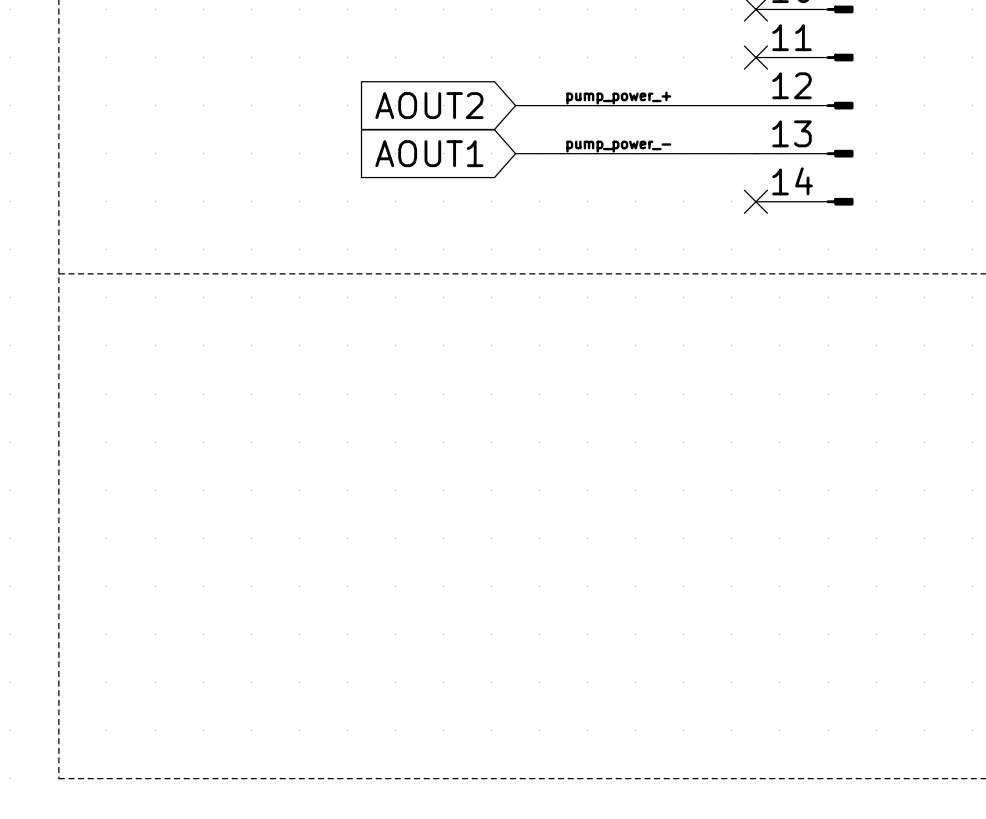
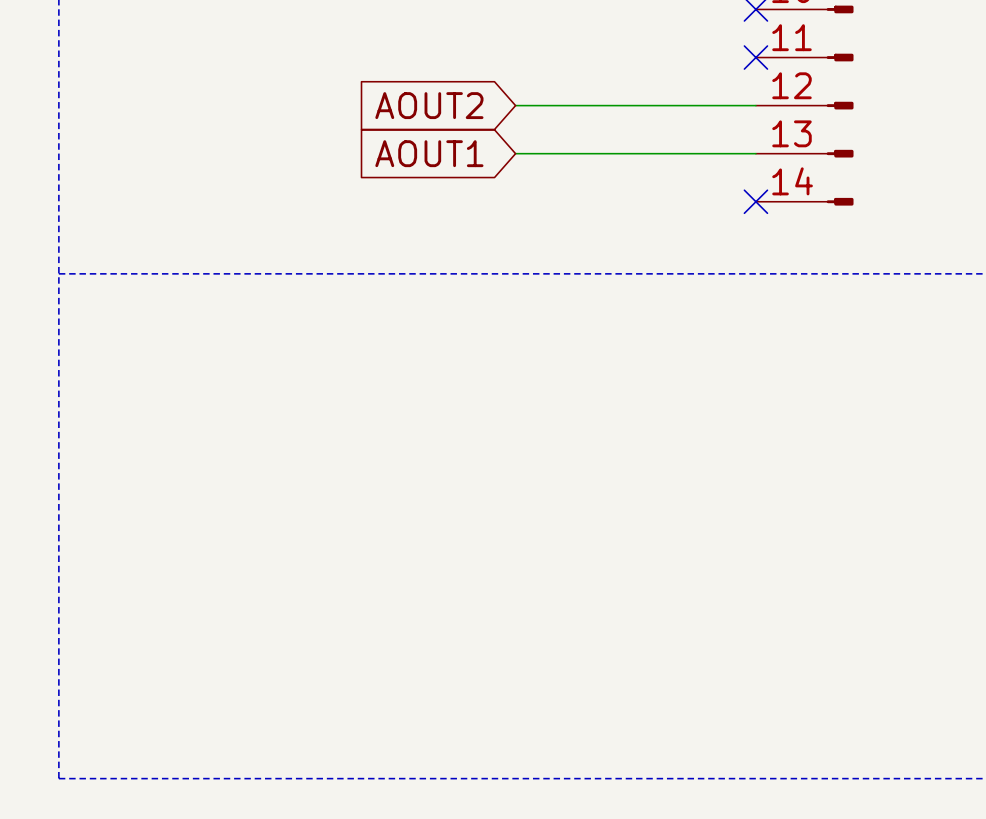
label: pump_power_+ (618, 98) -> none
label: pump_power_- (618, 146) -> none

